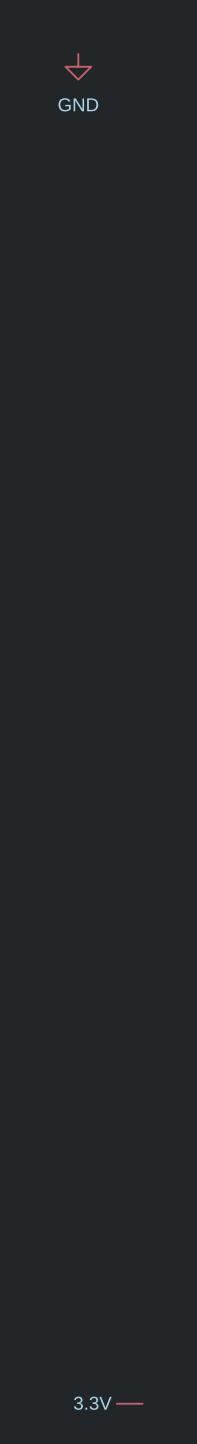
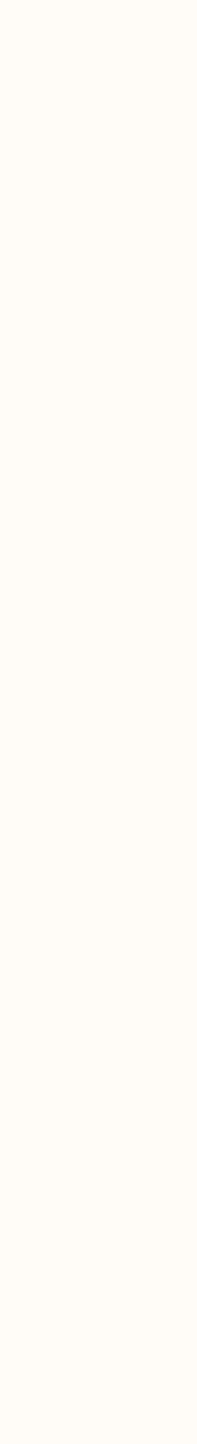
power symbol: GND (78, 66) -> none
part: (129, 1403) -> none

